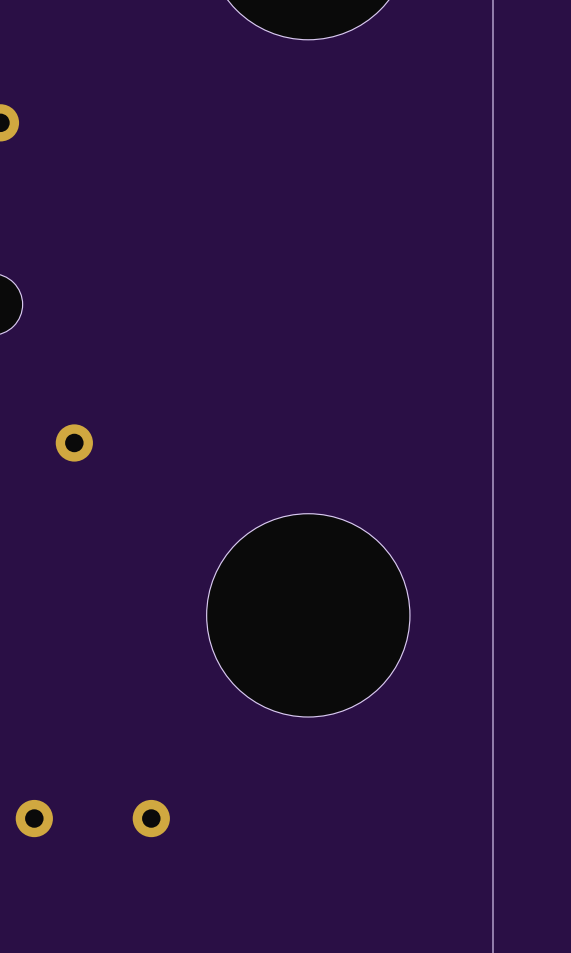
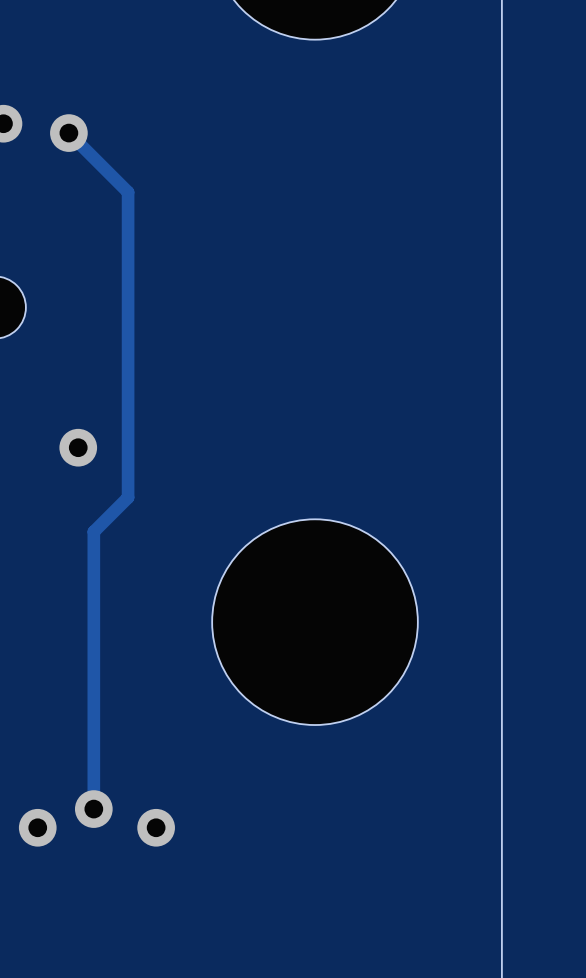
track: none -> (68, 133) (128, 192) (128, 497) (93, 531) (93, 809)
via: none -> (68, 133)
via: none -> (93, 809)

